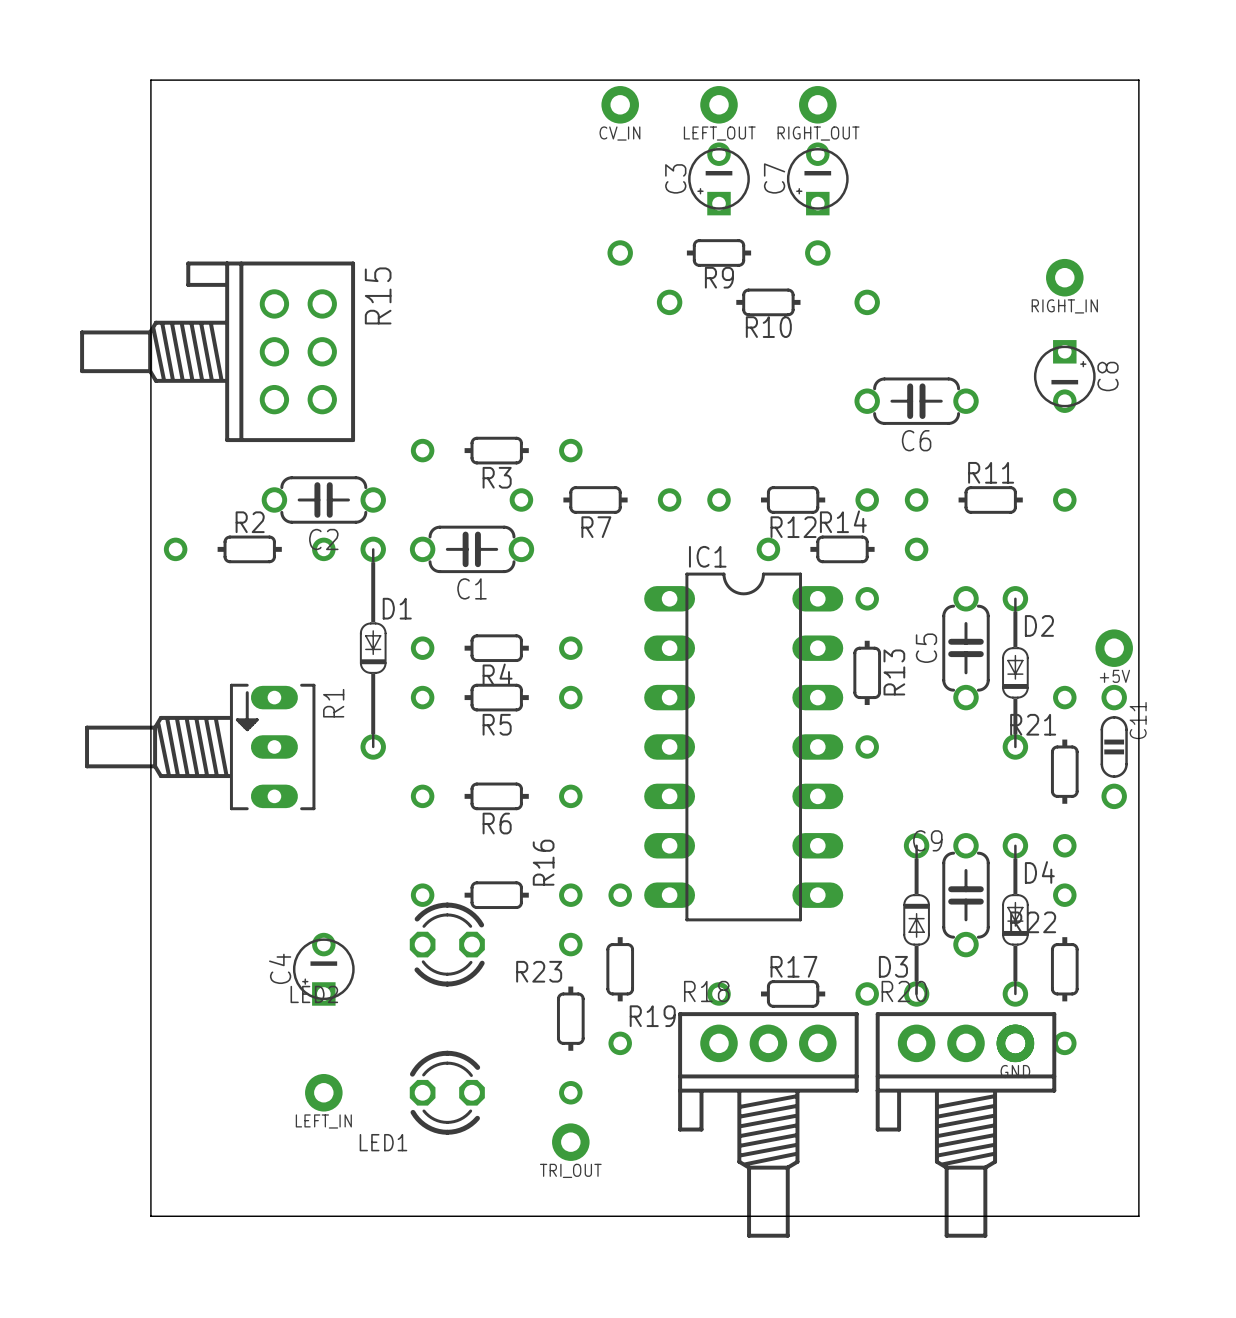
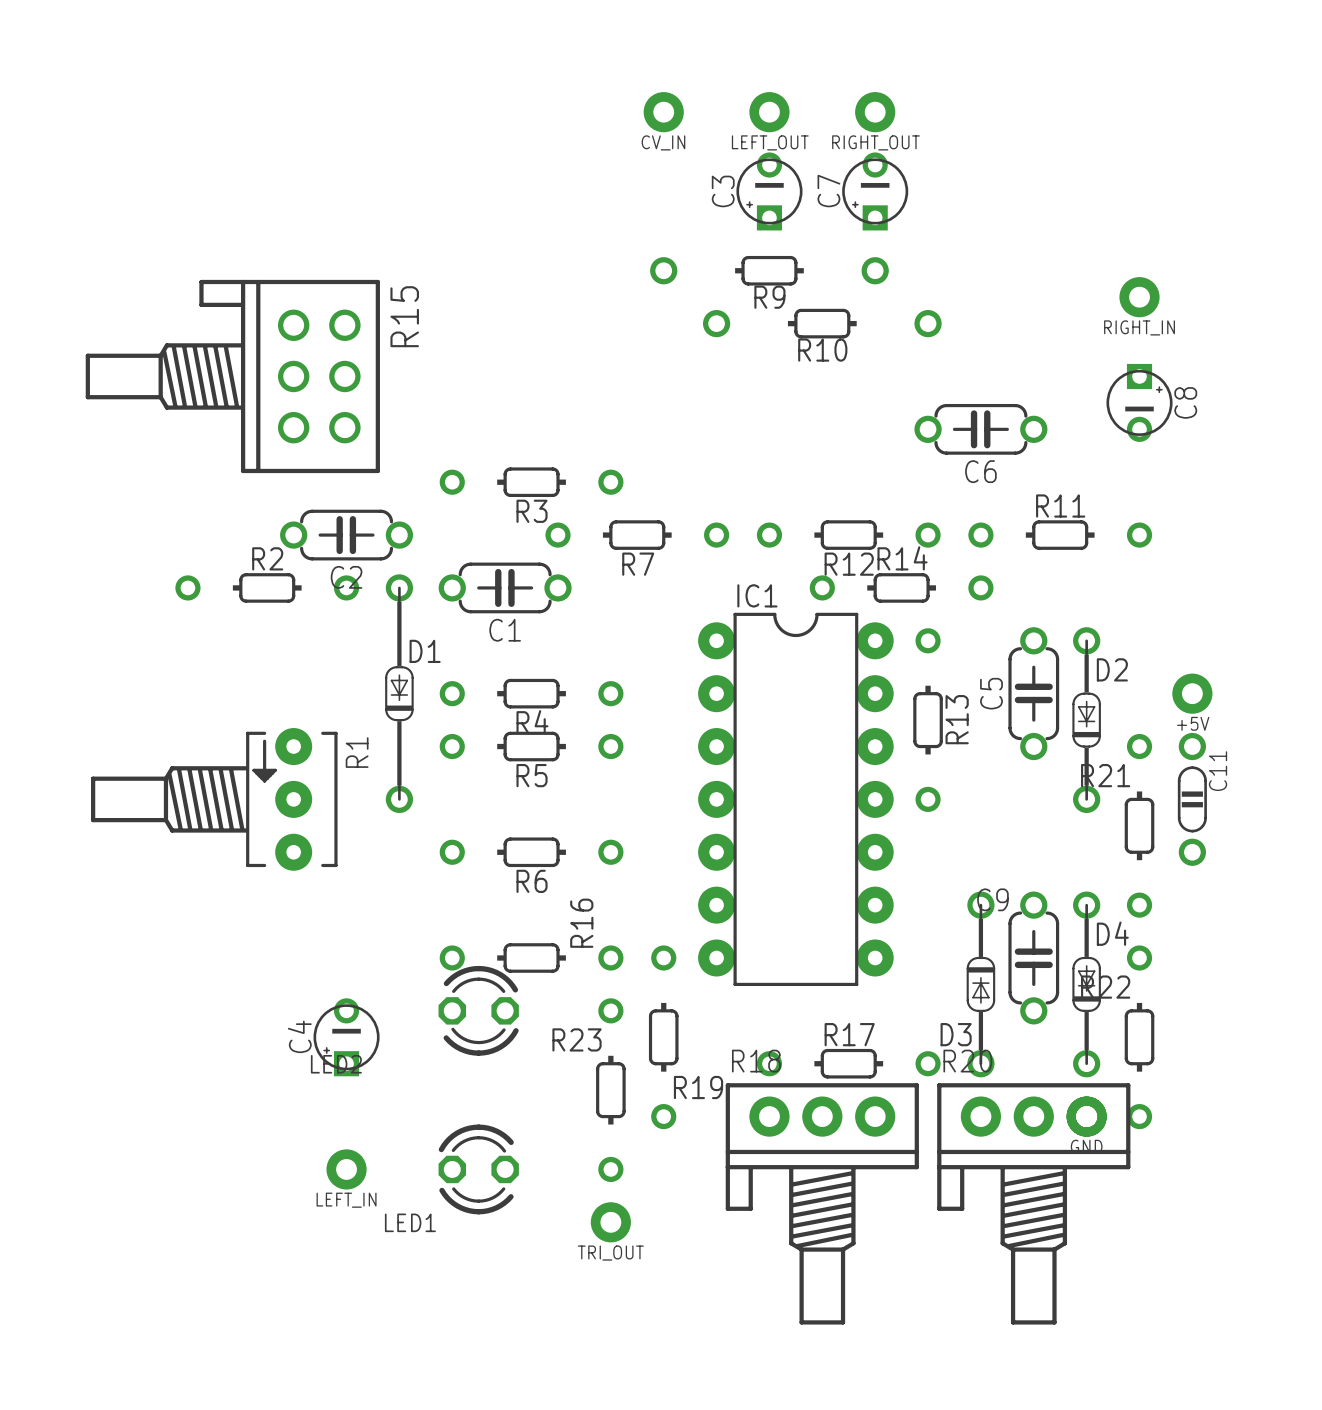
board edge: (150, 80) (1138, 80) (1138, 1216) (150, 1216) (150, 80) -> none
IC1 footprint: [644, 572, 844, 922] -> [698, 612, 894, 987]
R1 footprint: [85, 683, 316, 811] -> [91, 728, 338, 871]

